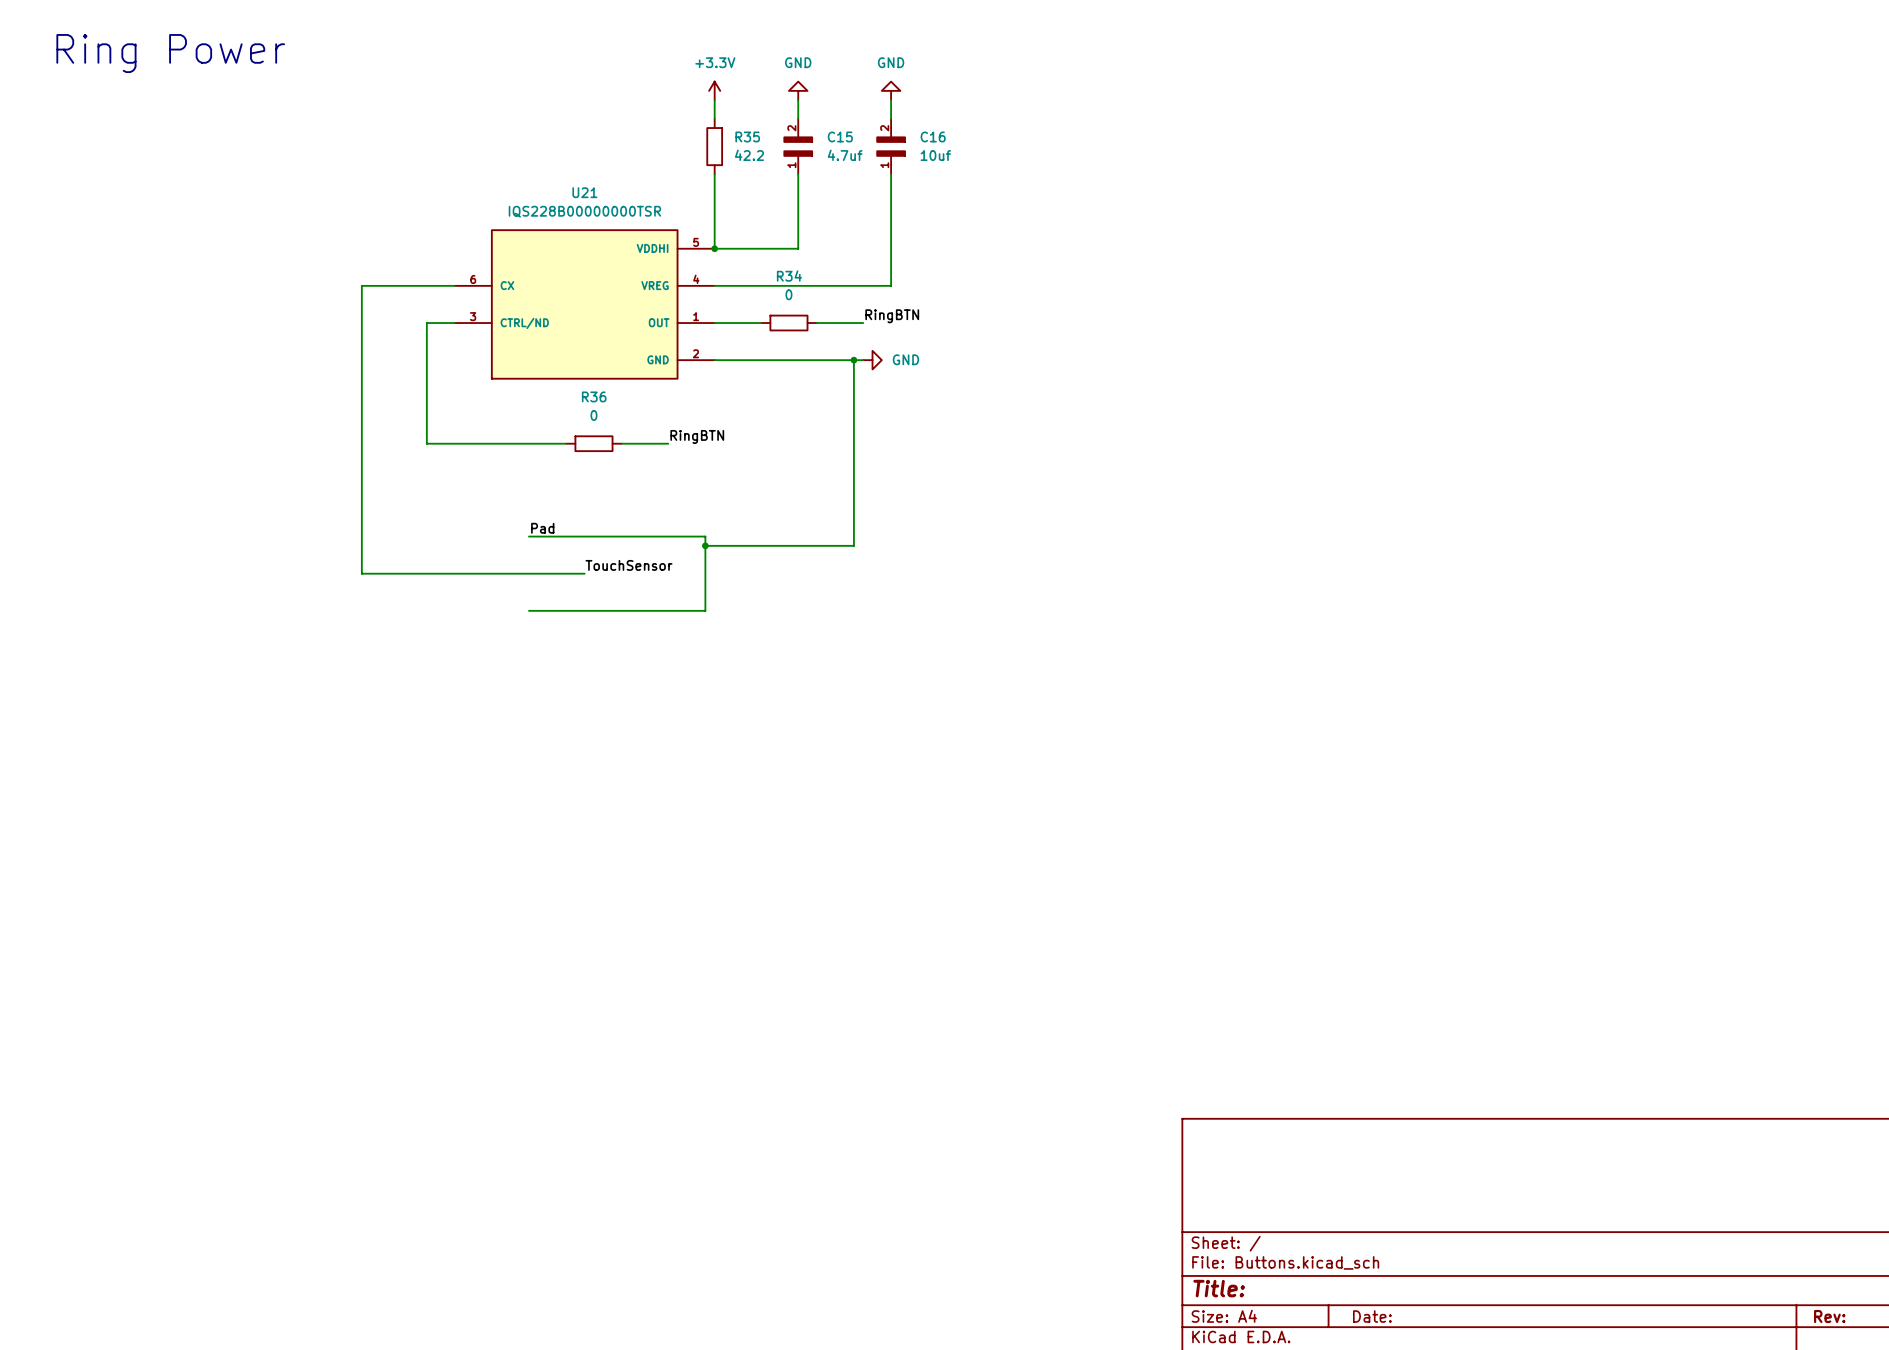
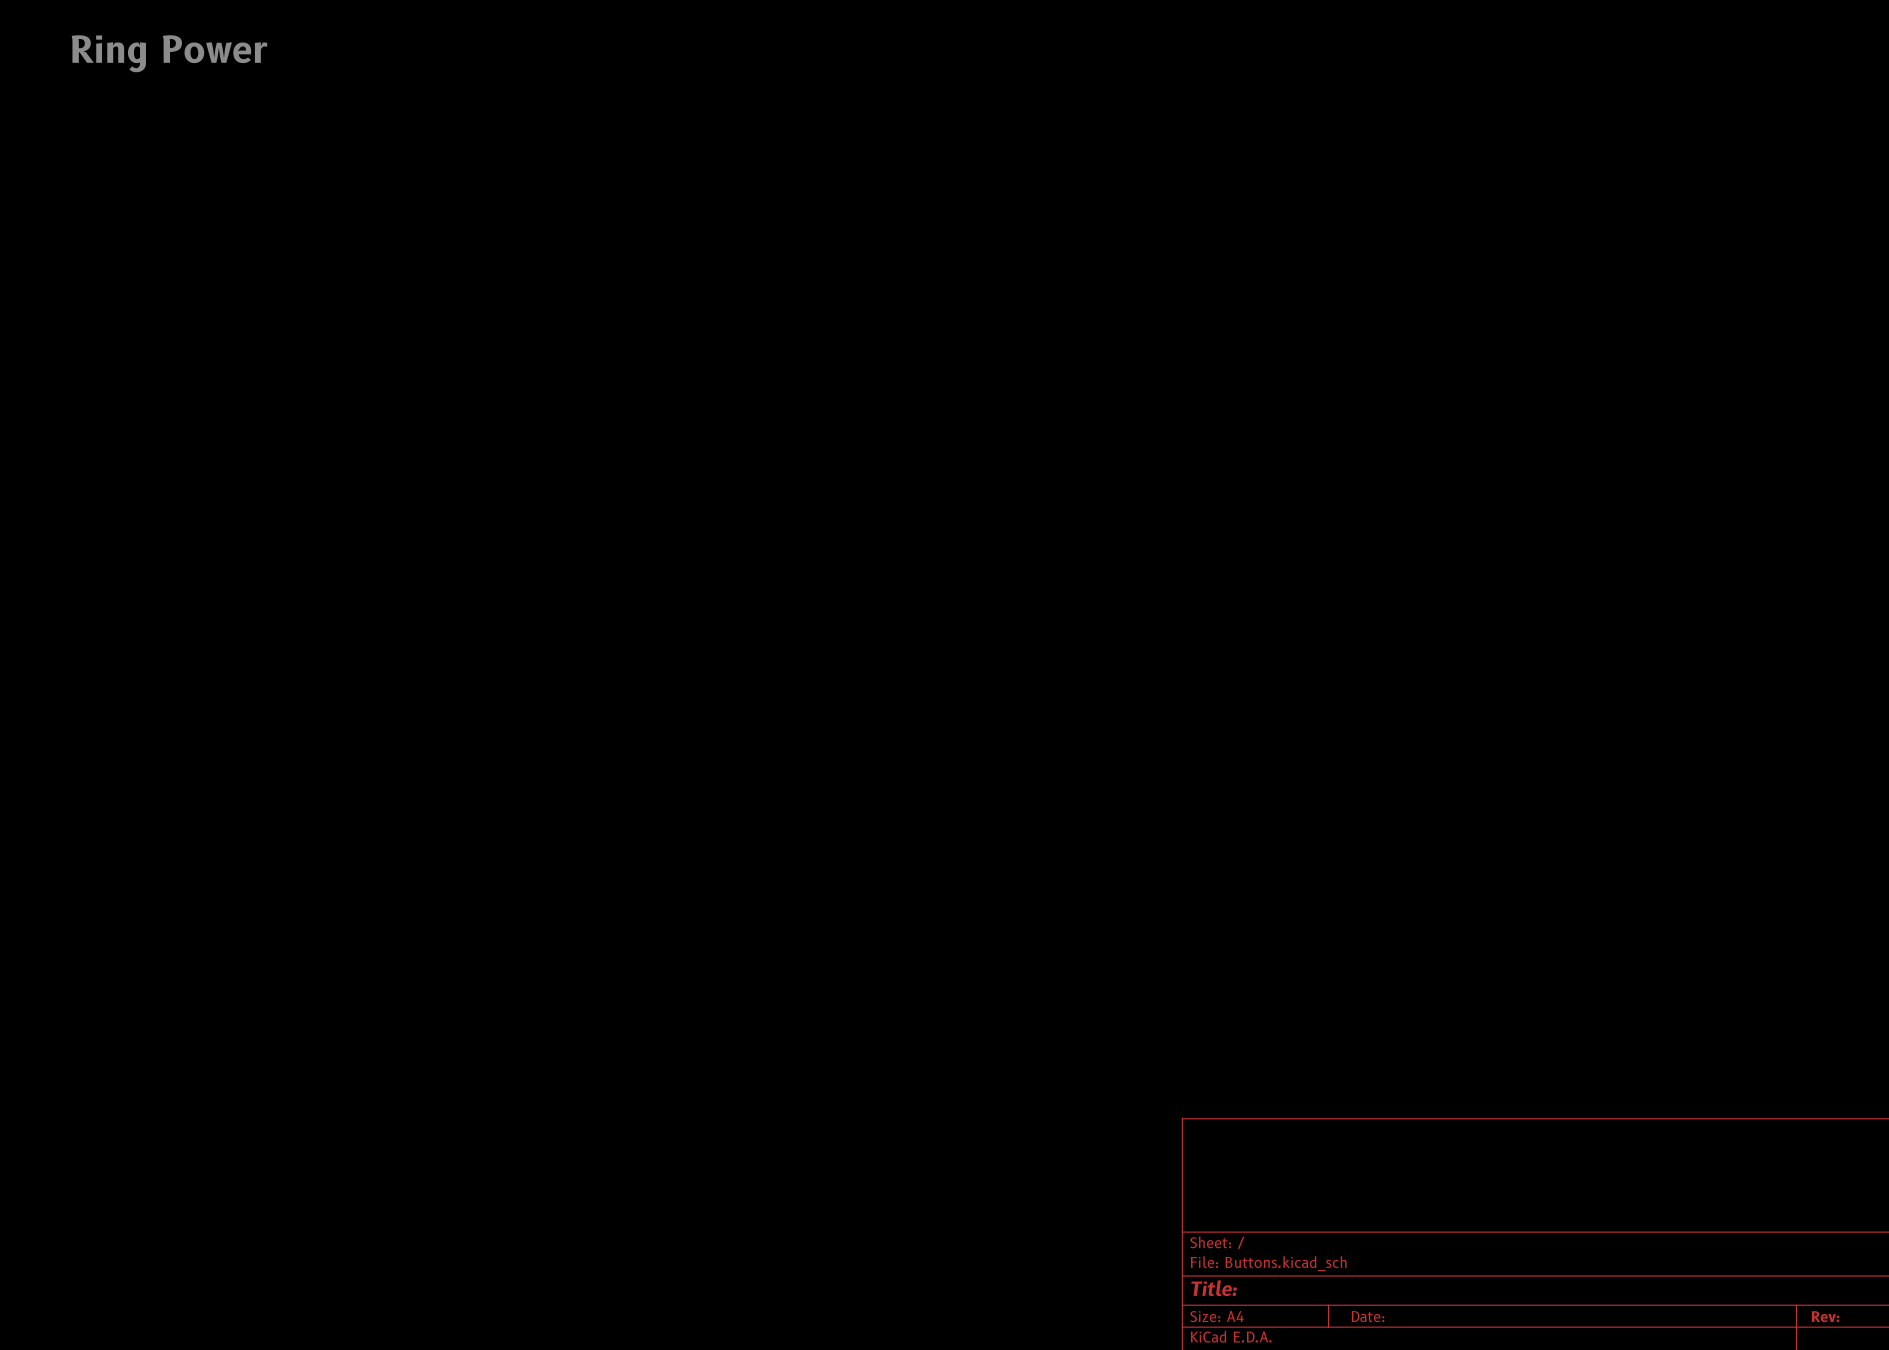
power symbol: +3.3V (714, 90) -> none
power symbol: GND (798, 90) -> none
power symbol: GND (891, 90) -> none
wire: (714, 100) (714, 118) -> none
wire: (798, 100) (798, 118) -> none
wire: (891, 100) (891, 118) -> none
R35: 42.2 (714, 146) -> none
C15: 4.7uf (798, 146) -> none
C16: 10uf (891, 146) -> none
wire: (714, 174) (714, 248) (798, 248) (798, 174) -> none
wire: (891, 174) (891, 285) (714, 285) -> none
junction: (714, 248) -> none
wire: (454, 285) (361, 285) (361, 573) (584, 573) -> none
U21: IQS228B00000000TSR (584, 304) -> none
label: RingBTN (892, 316) -> none
wire: (454, 323) (426, 323) (426, 443) (566, 443) -> none
wire: (714, 323) (761, 323) -> none
R34: 0 (788, 323) -> none
wire: (816, 323) (863, 323) -> none
wire: (714, 360) (863, 360) -> none
wire: (853, 360) (853, 545) (705, 545) -> none
junction: (853, 360) -> none
power symbol: GND (872, 360) -> none
label: RingBTN (697, 436) -> none
R36: 0 (593, 443) -> none
wire: (621, 443) (668, 443) -> none
label: Pad (542, 528) -> none
wire: (528, 536) (705, 536) (705, 610) (528, 610) -> none
junction: (705, 545) -> none
label: TouchSensor (628, 565) -> none

